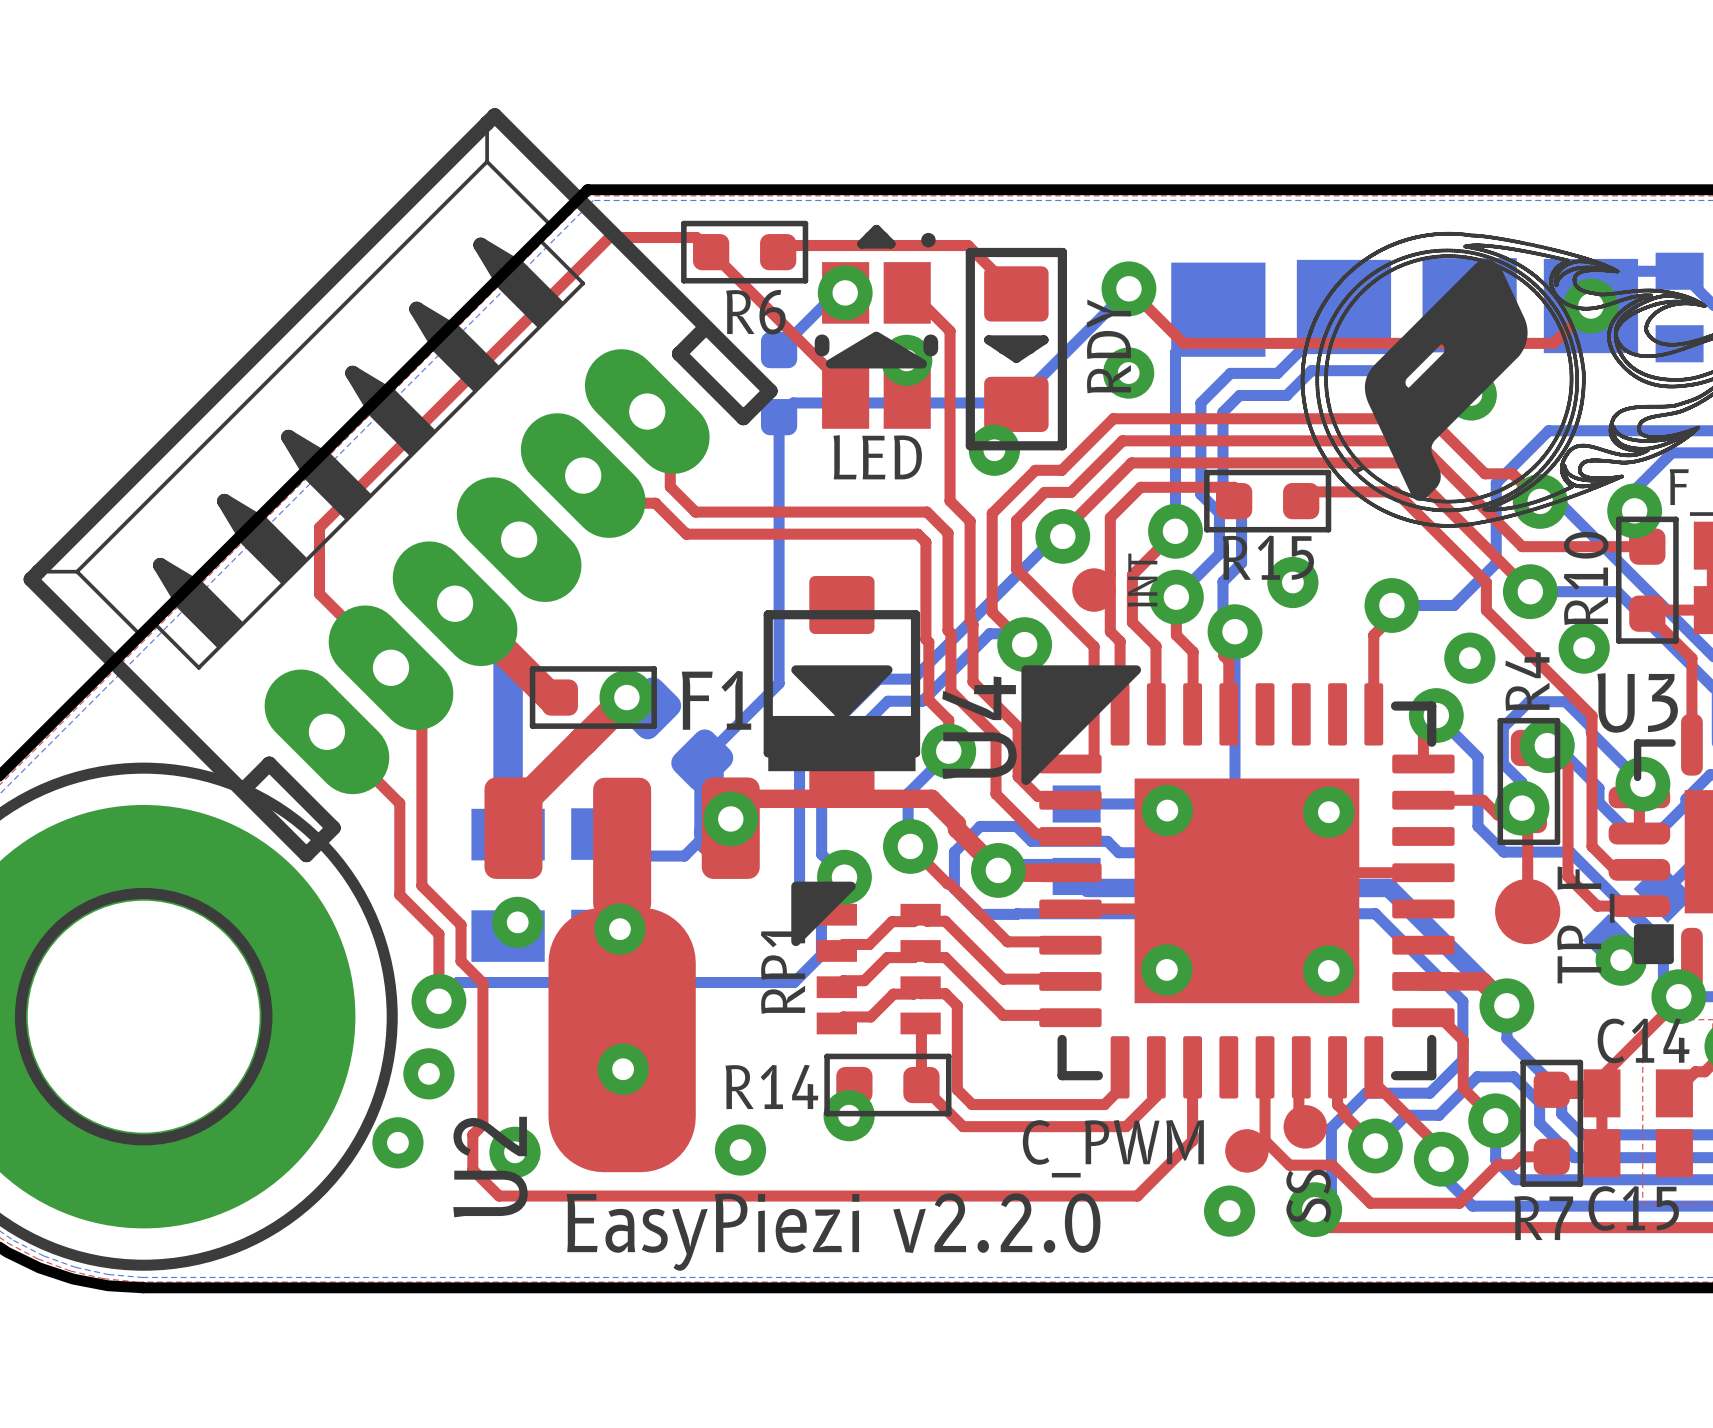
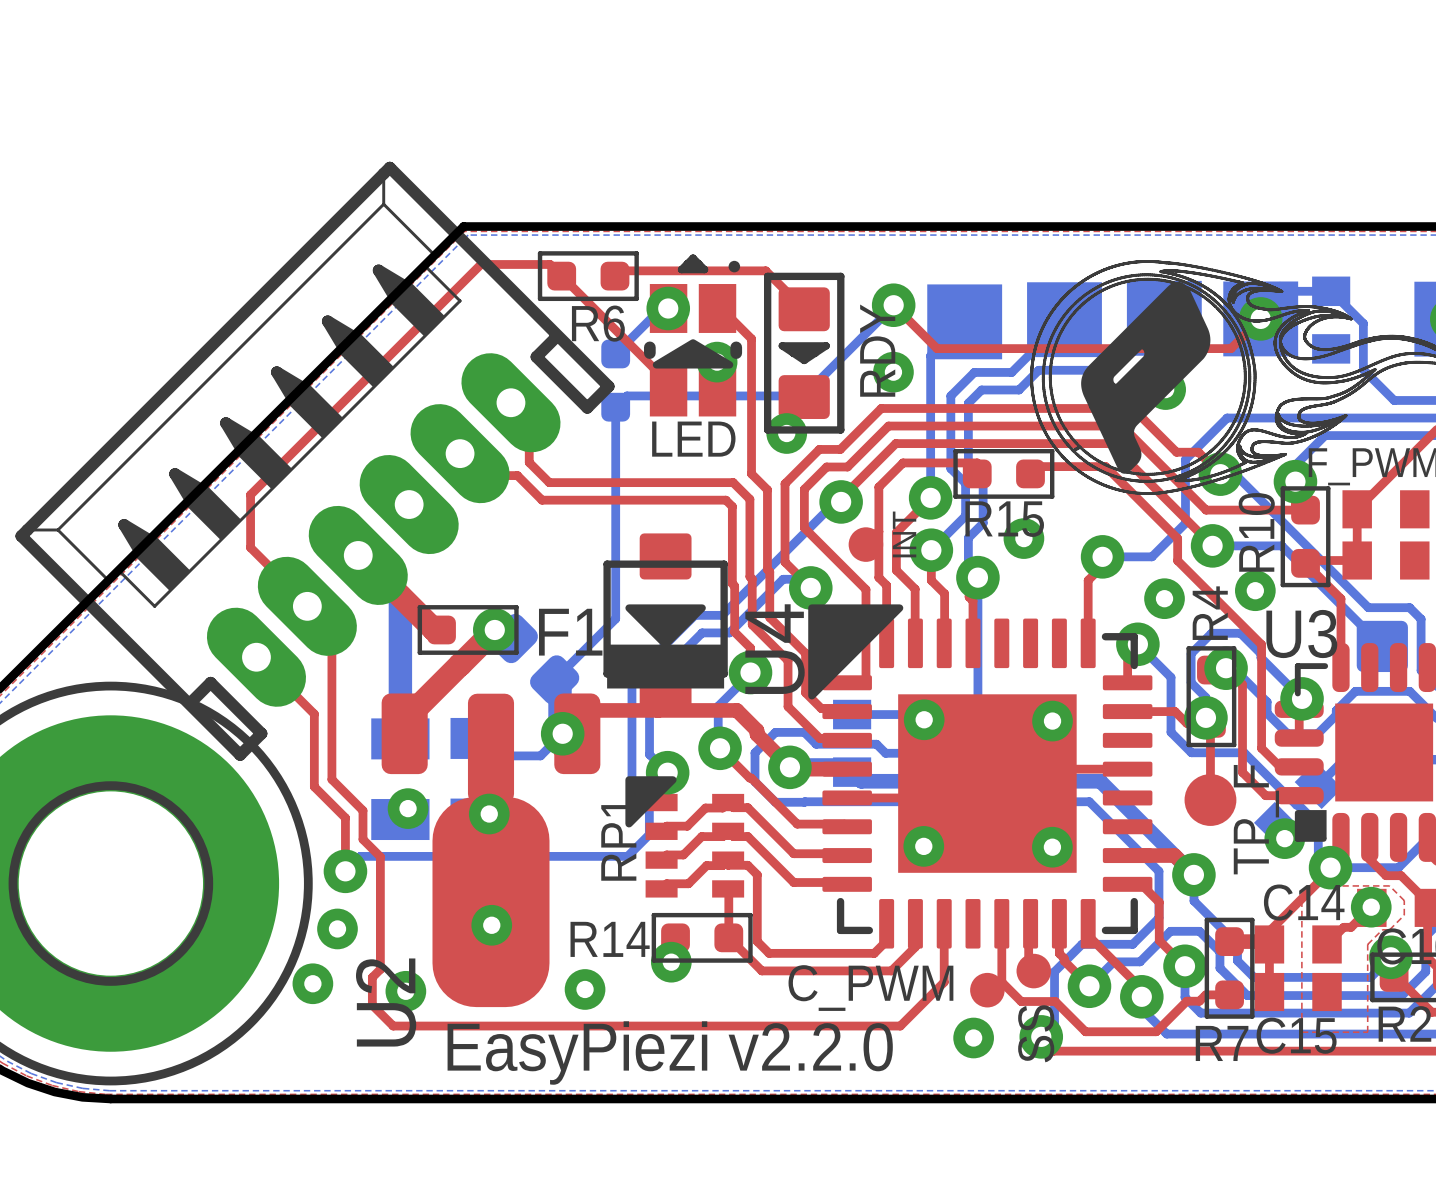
via position: (730, 818) -> (562, 733)

